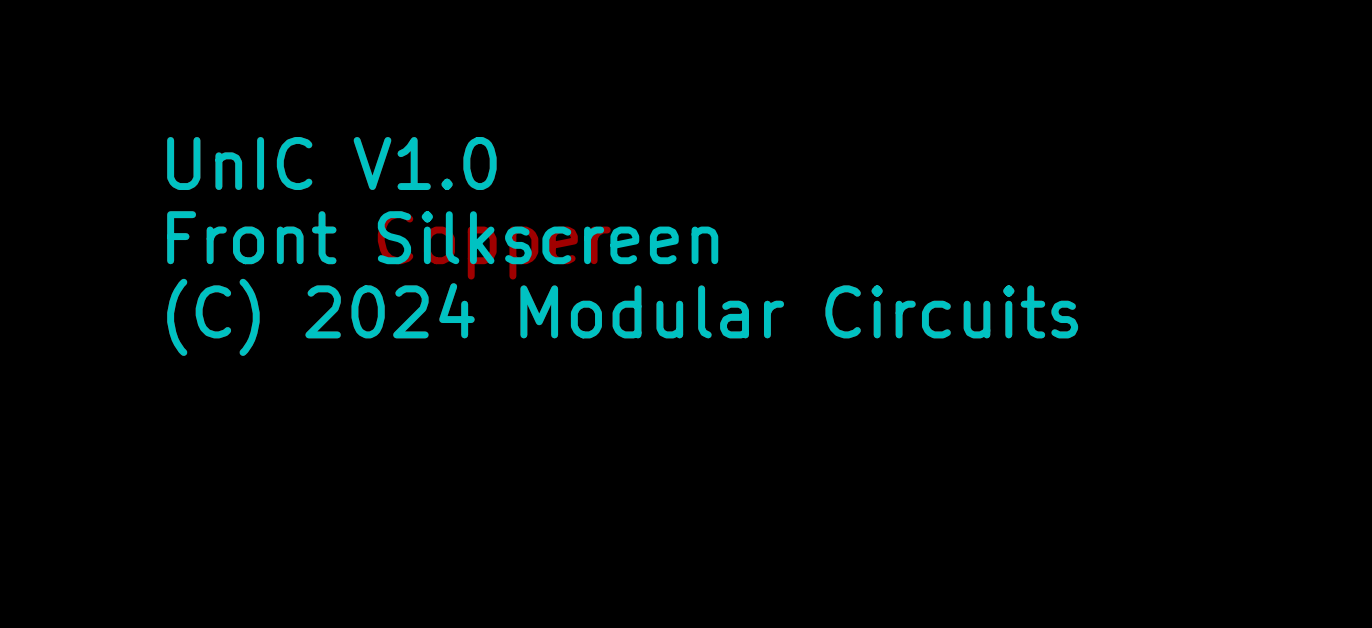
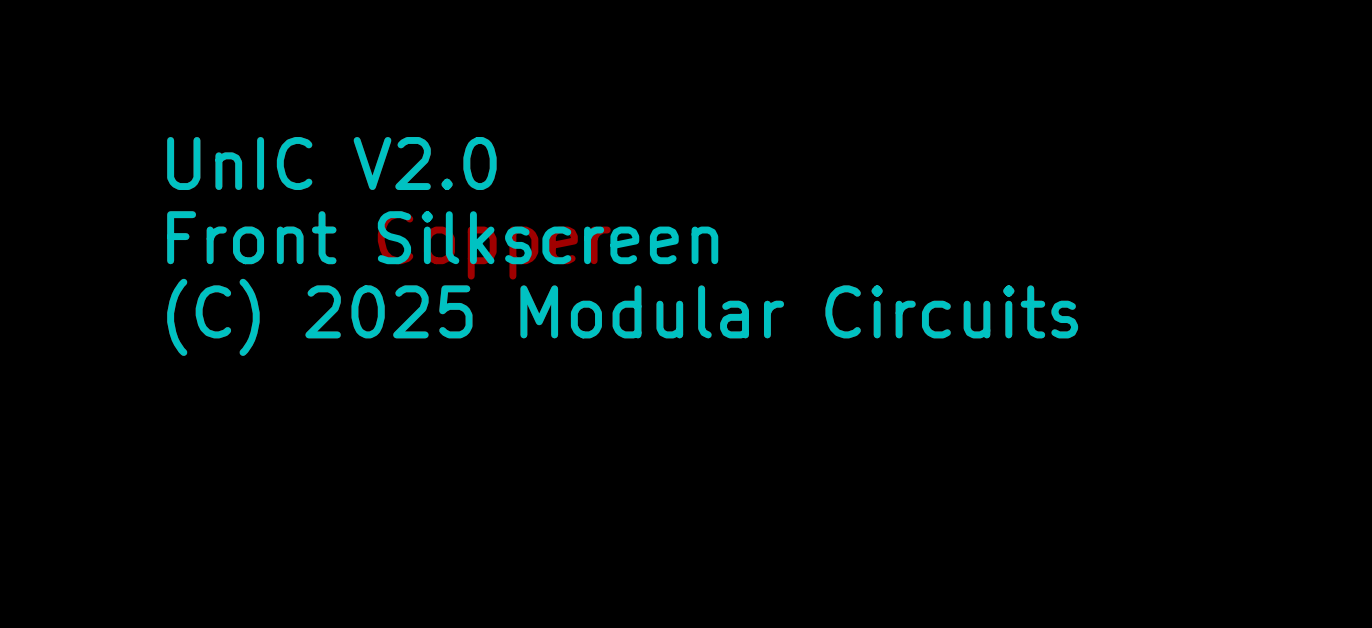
text: UnIC V1.0 (331, 163) -> none
text: none -> UnIC V2.0 (331, 163)
text: (C) 2024 Modular Circuits (622, 317) -> none
text: none -> (C) 2025 Modular Circuits (622, 317)

